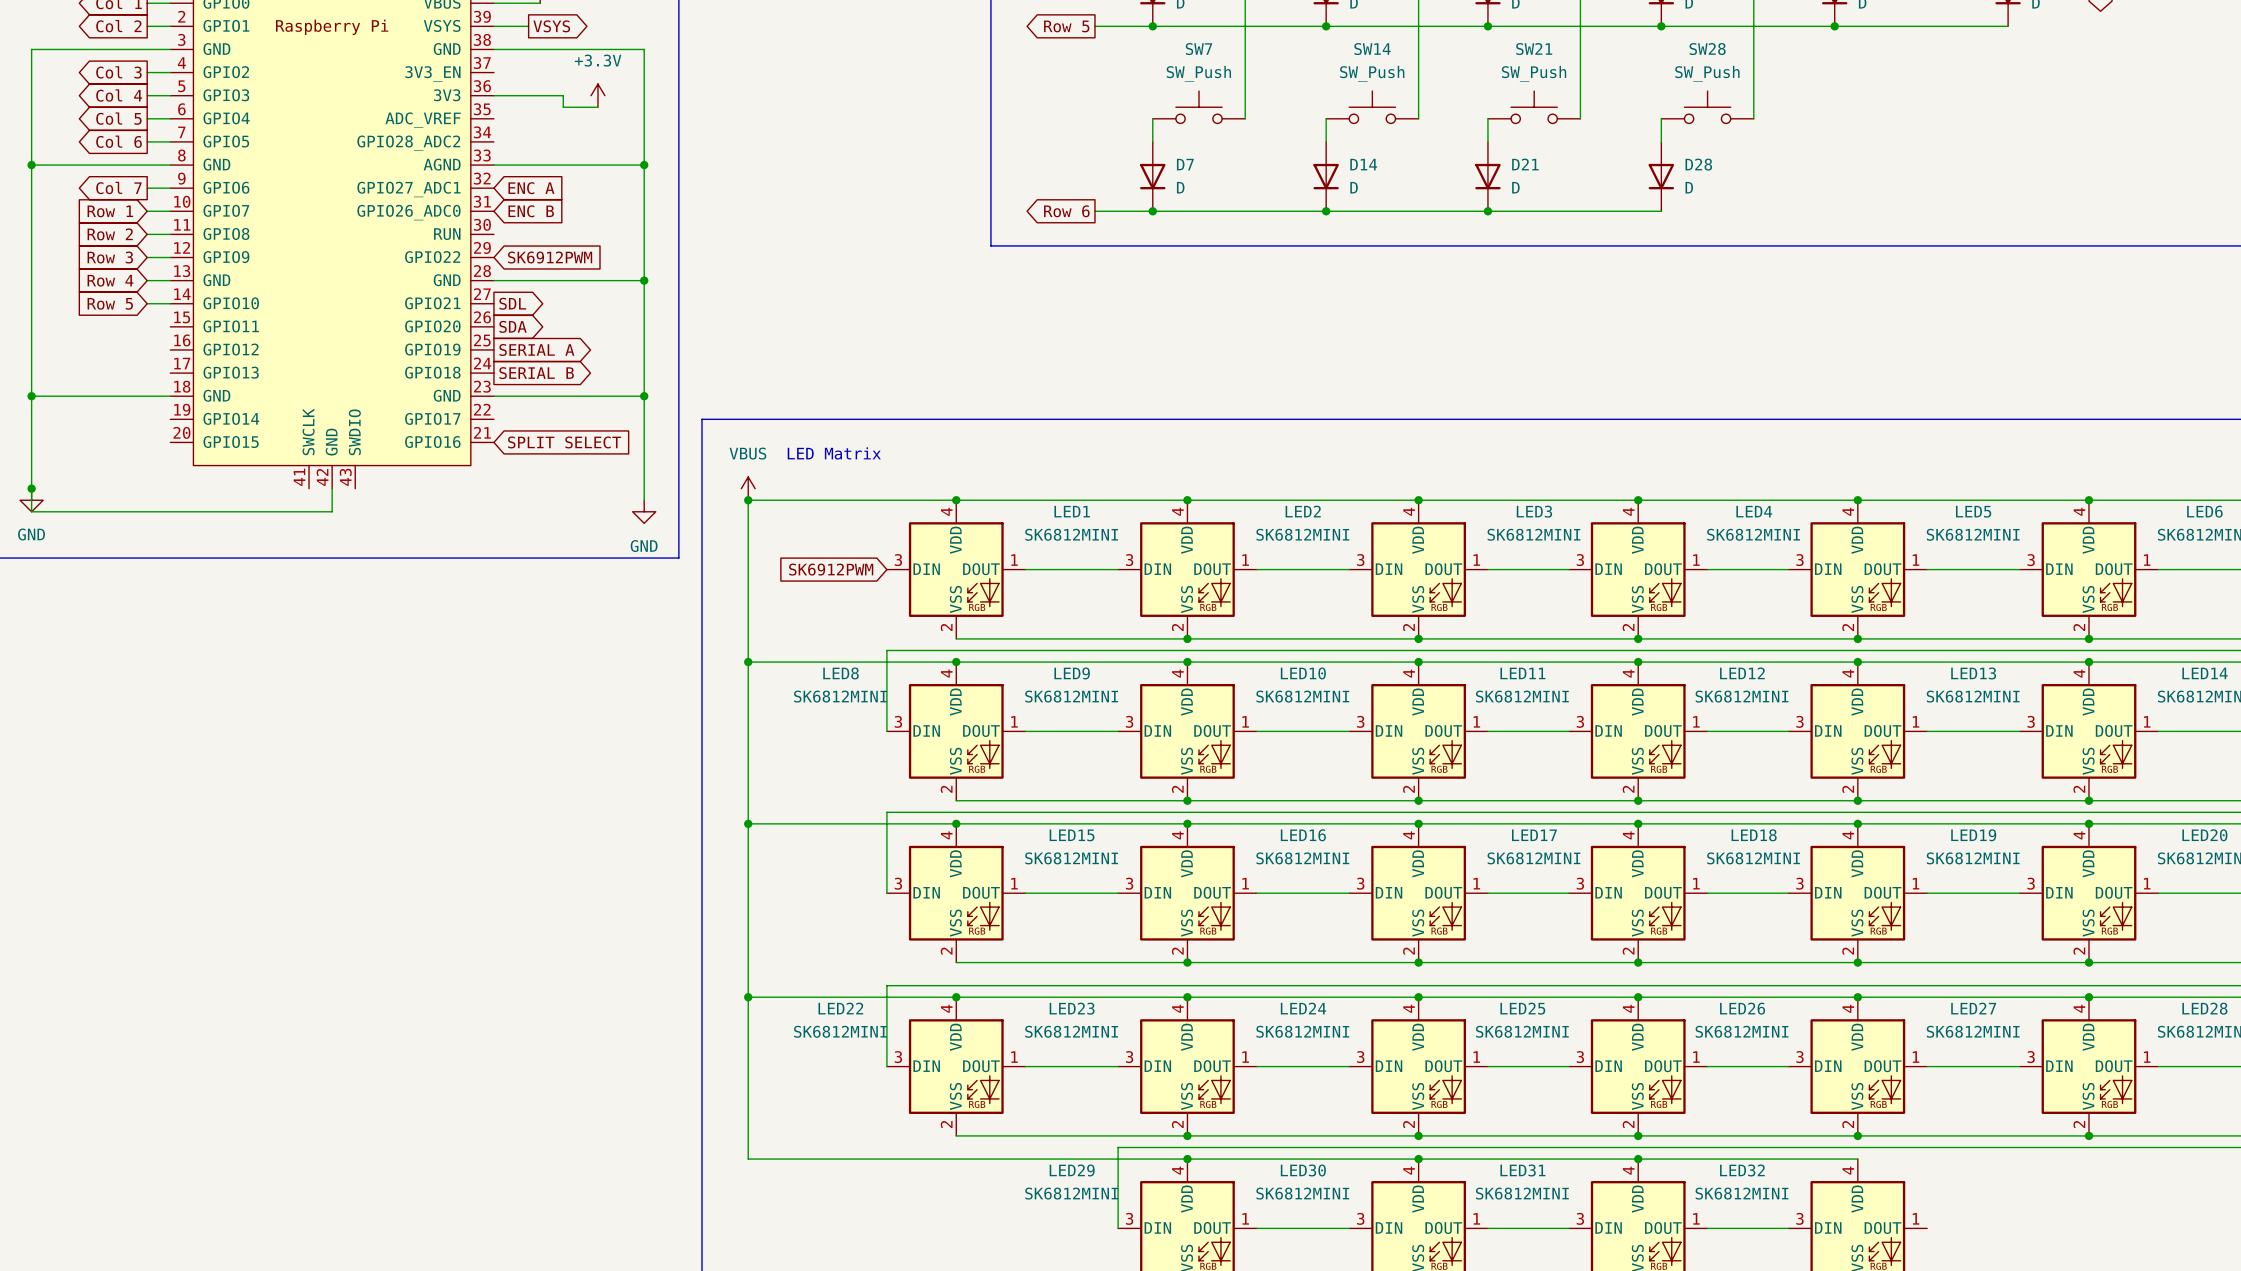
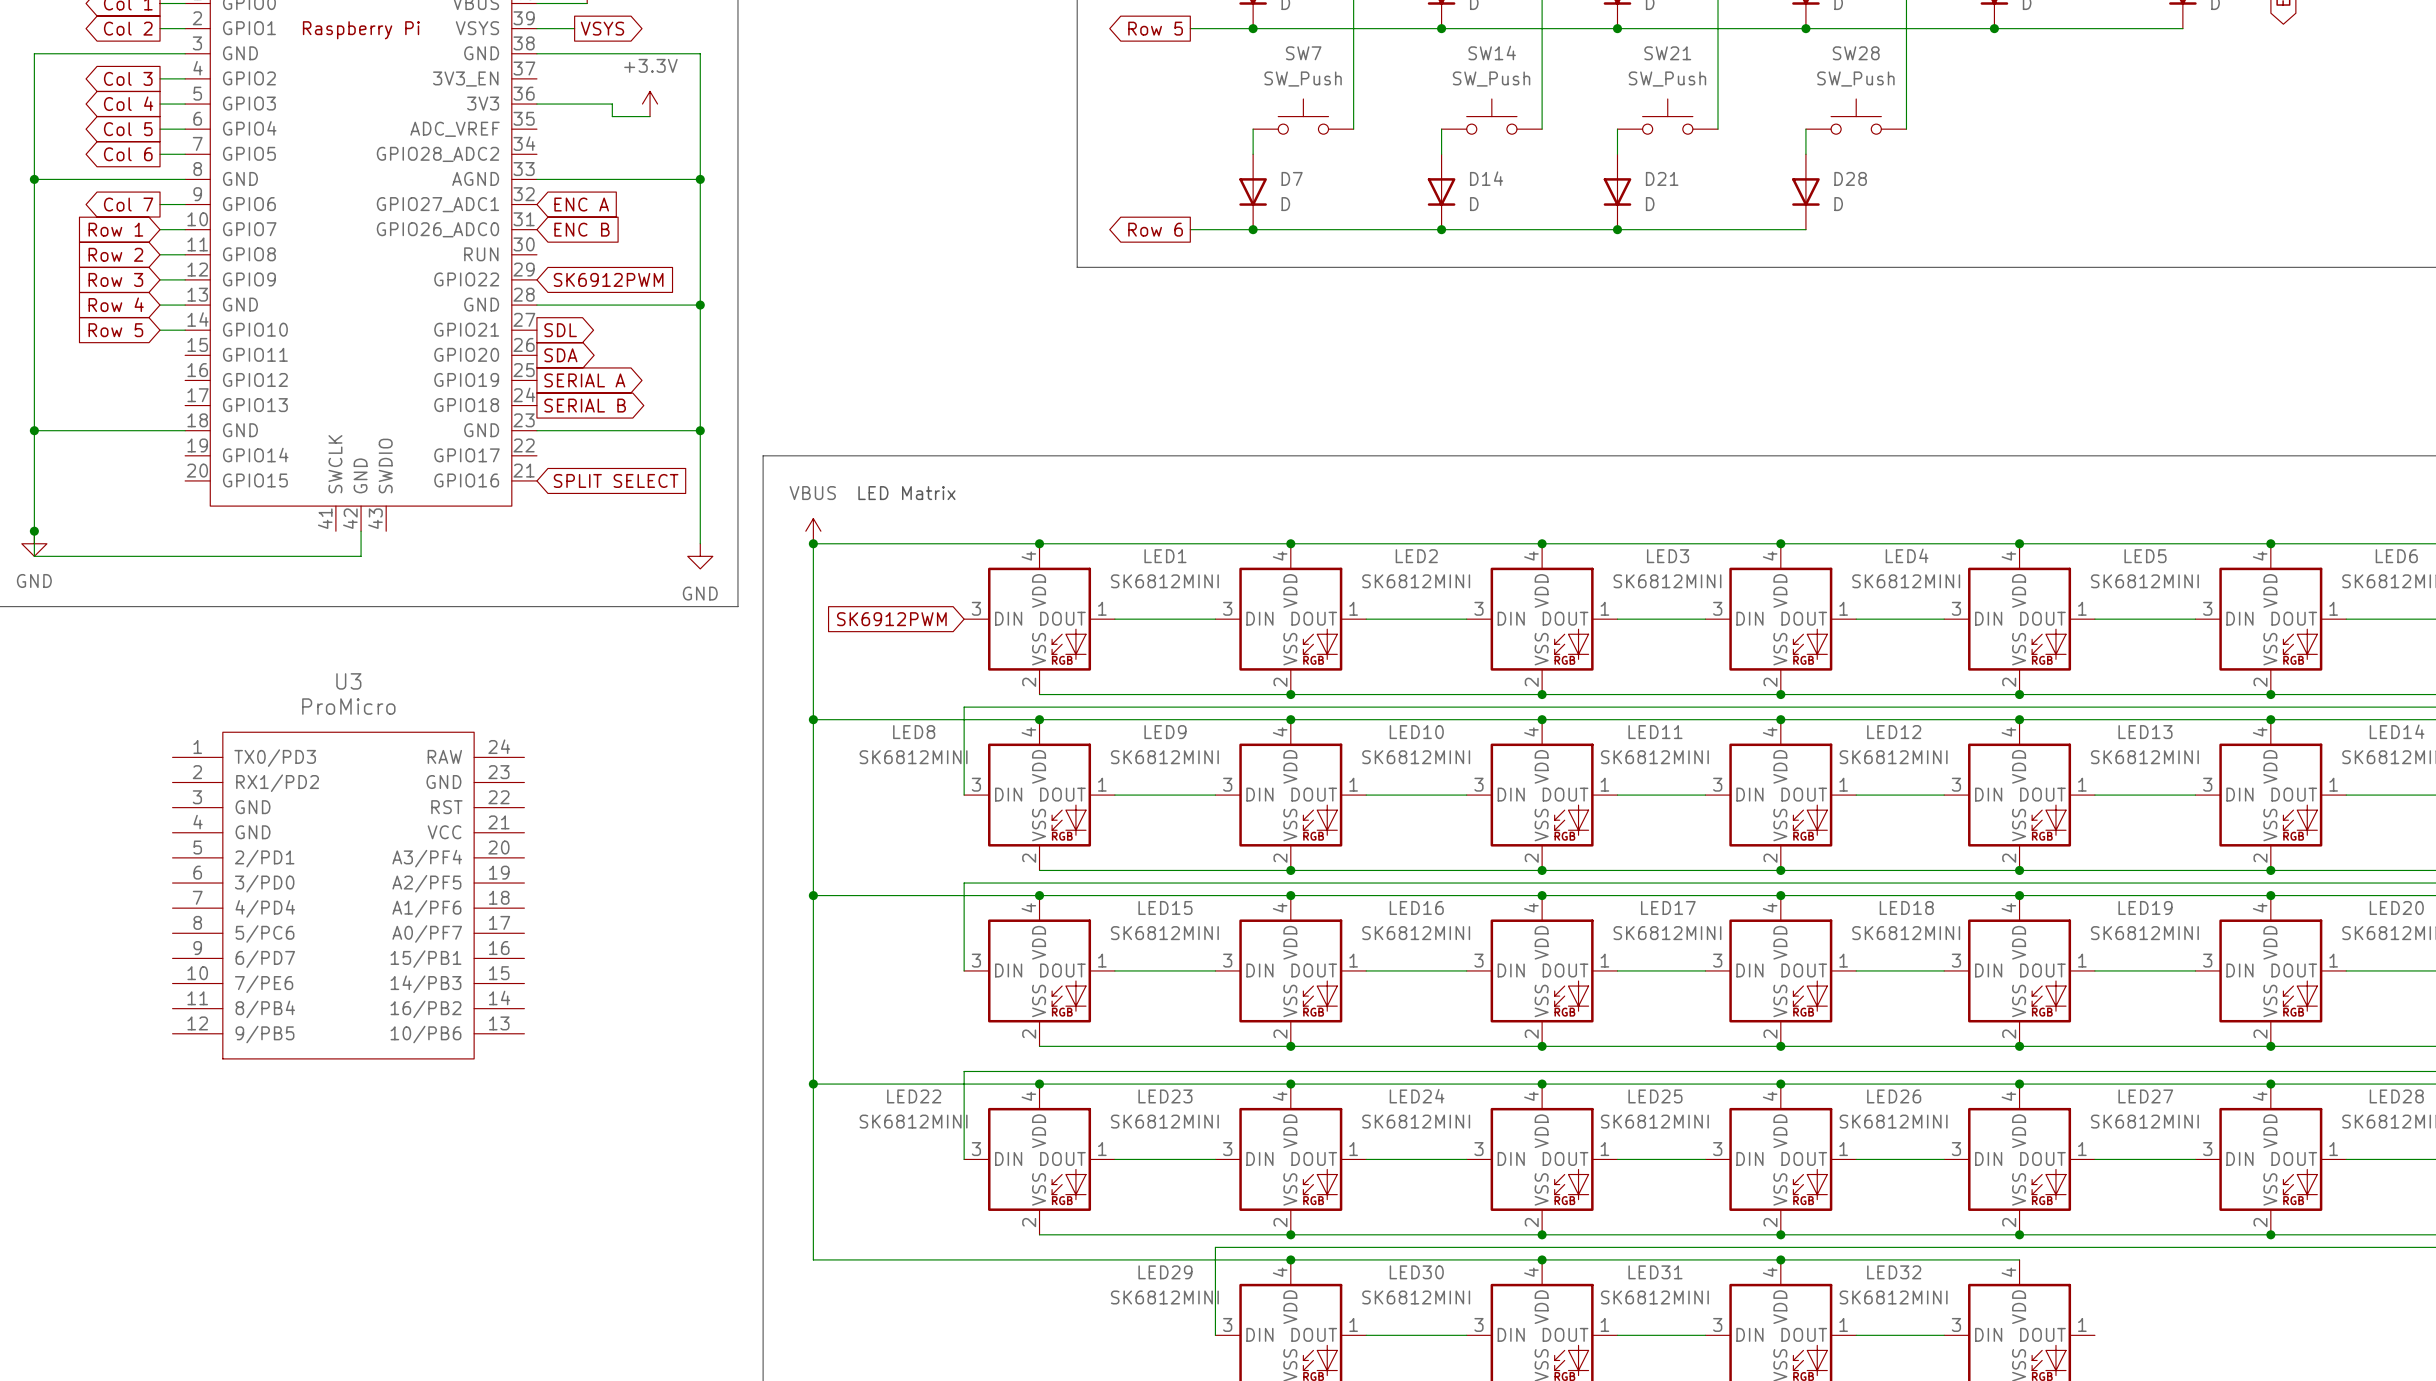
U3: none -> ProMicro (348, 895)

